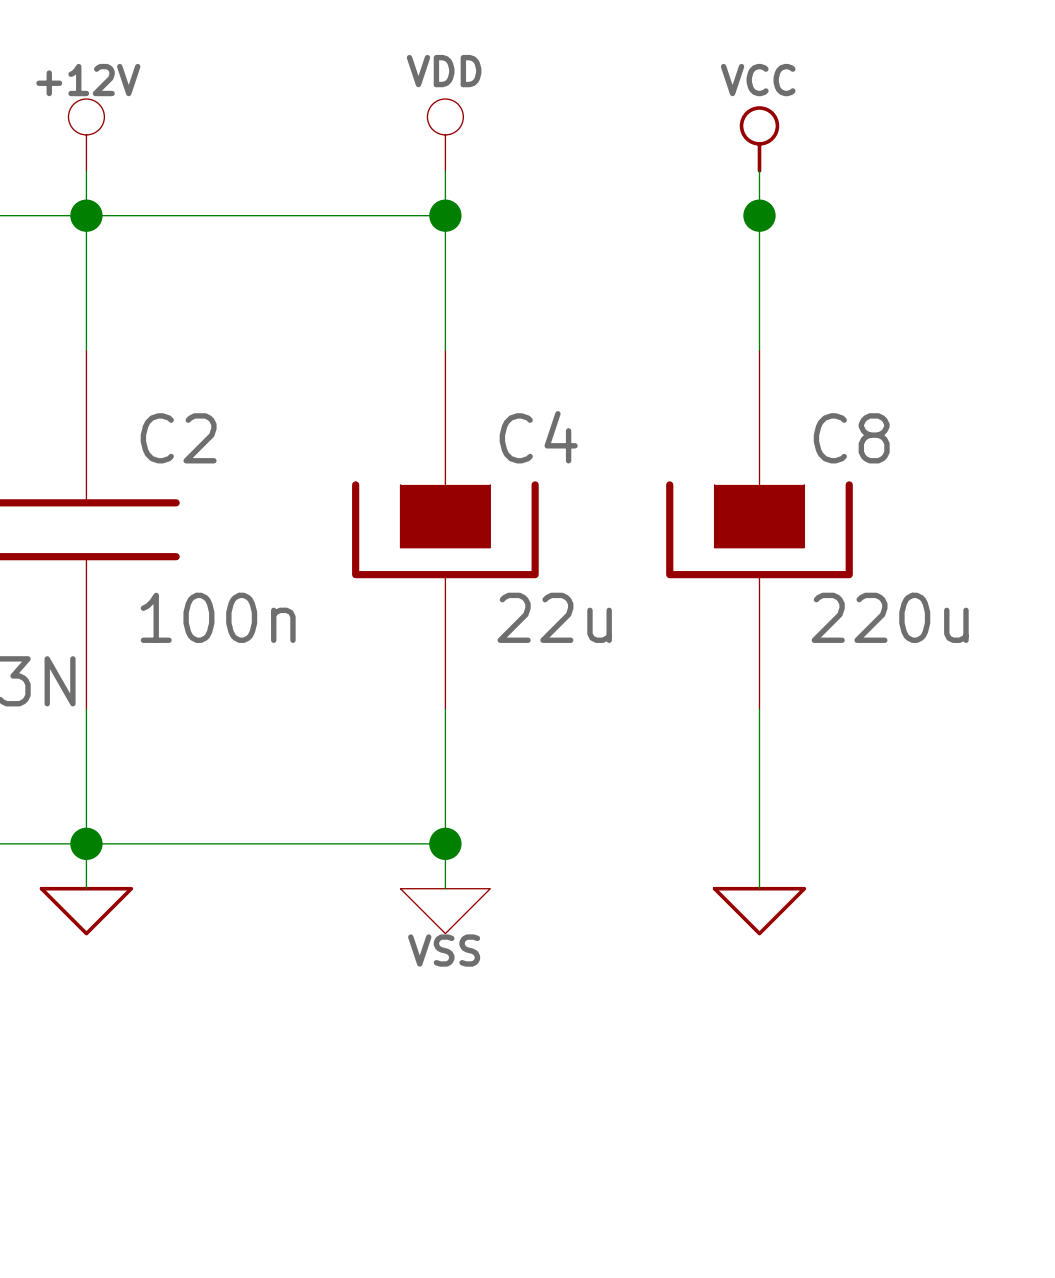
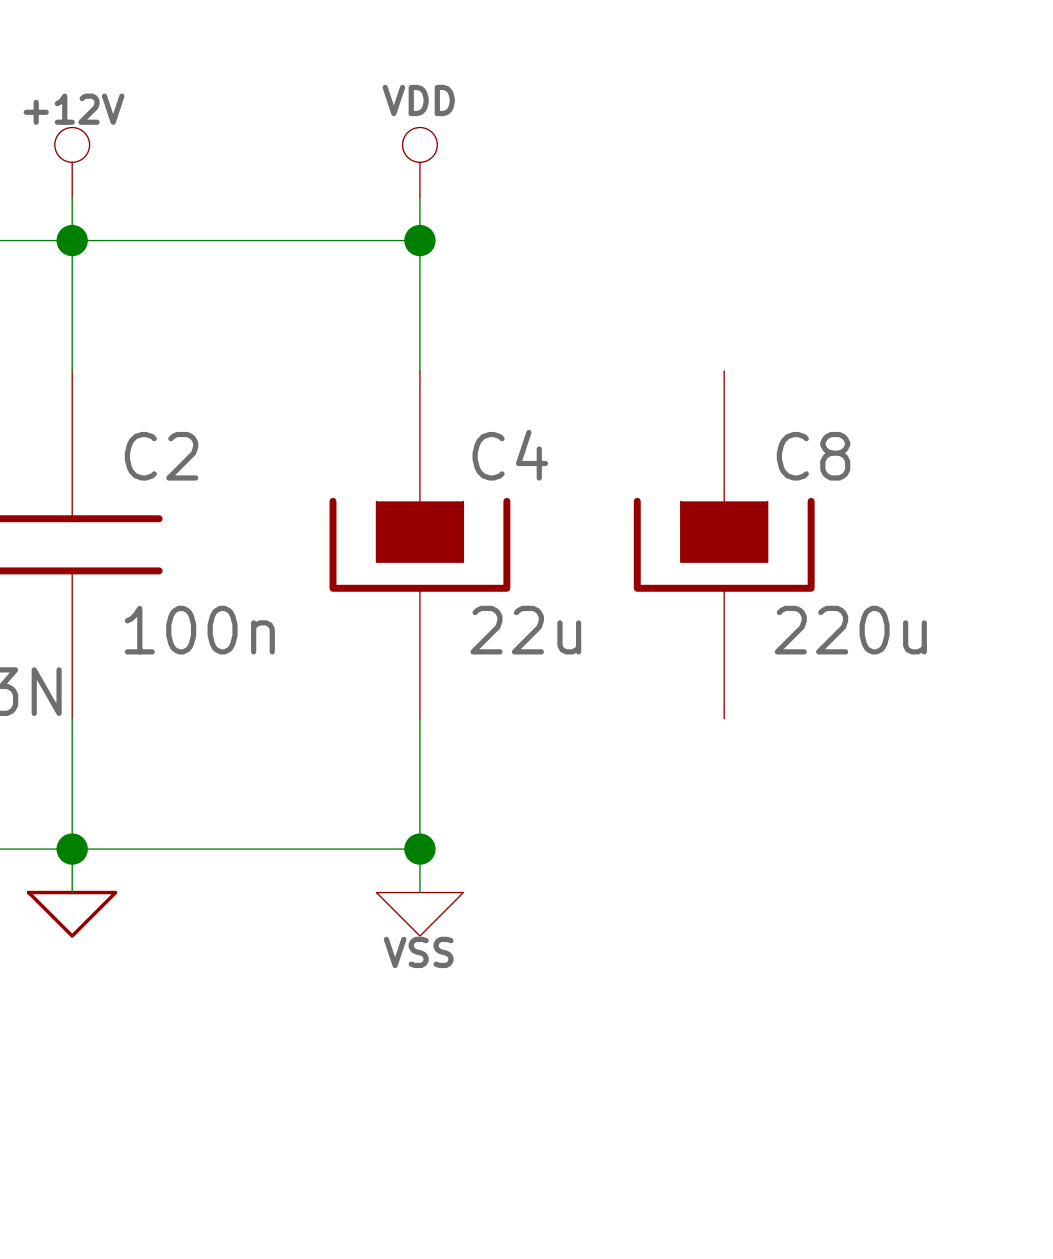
power symbol: VCC (759, 139) -> none
wire: (759, 170) (759, 350) -> none
junction: (759, 215) -> none
wire: (759, 709) (759, 888) -> none
power symbol: (759, 911) -> none

